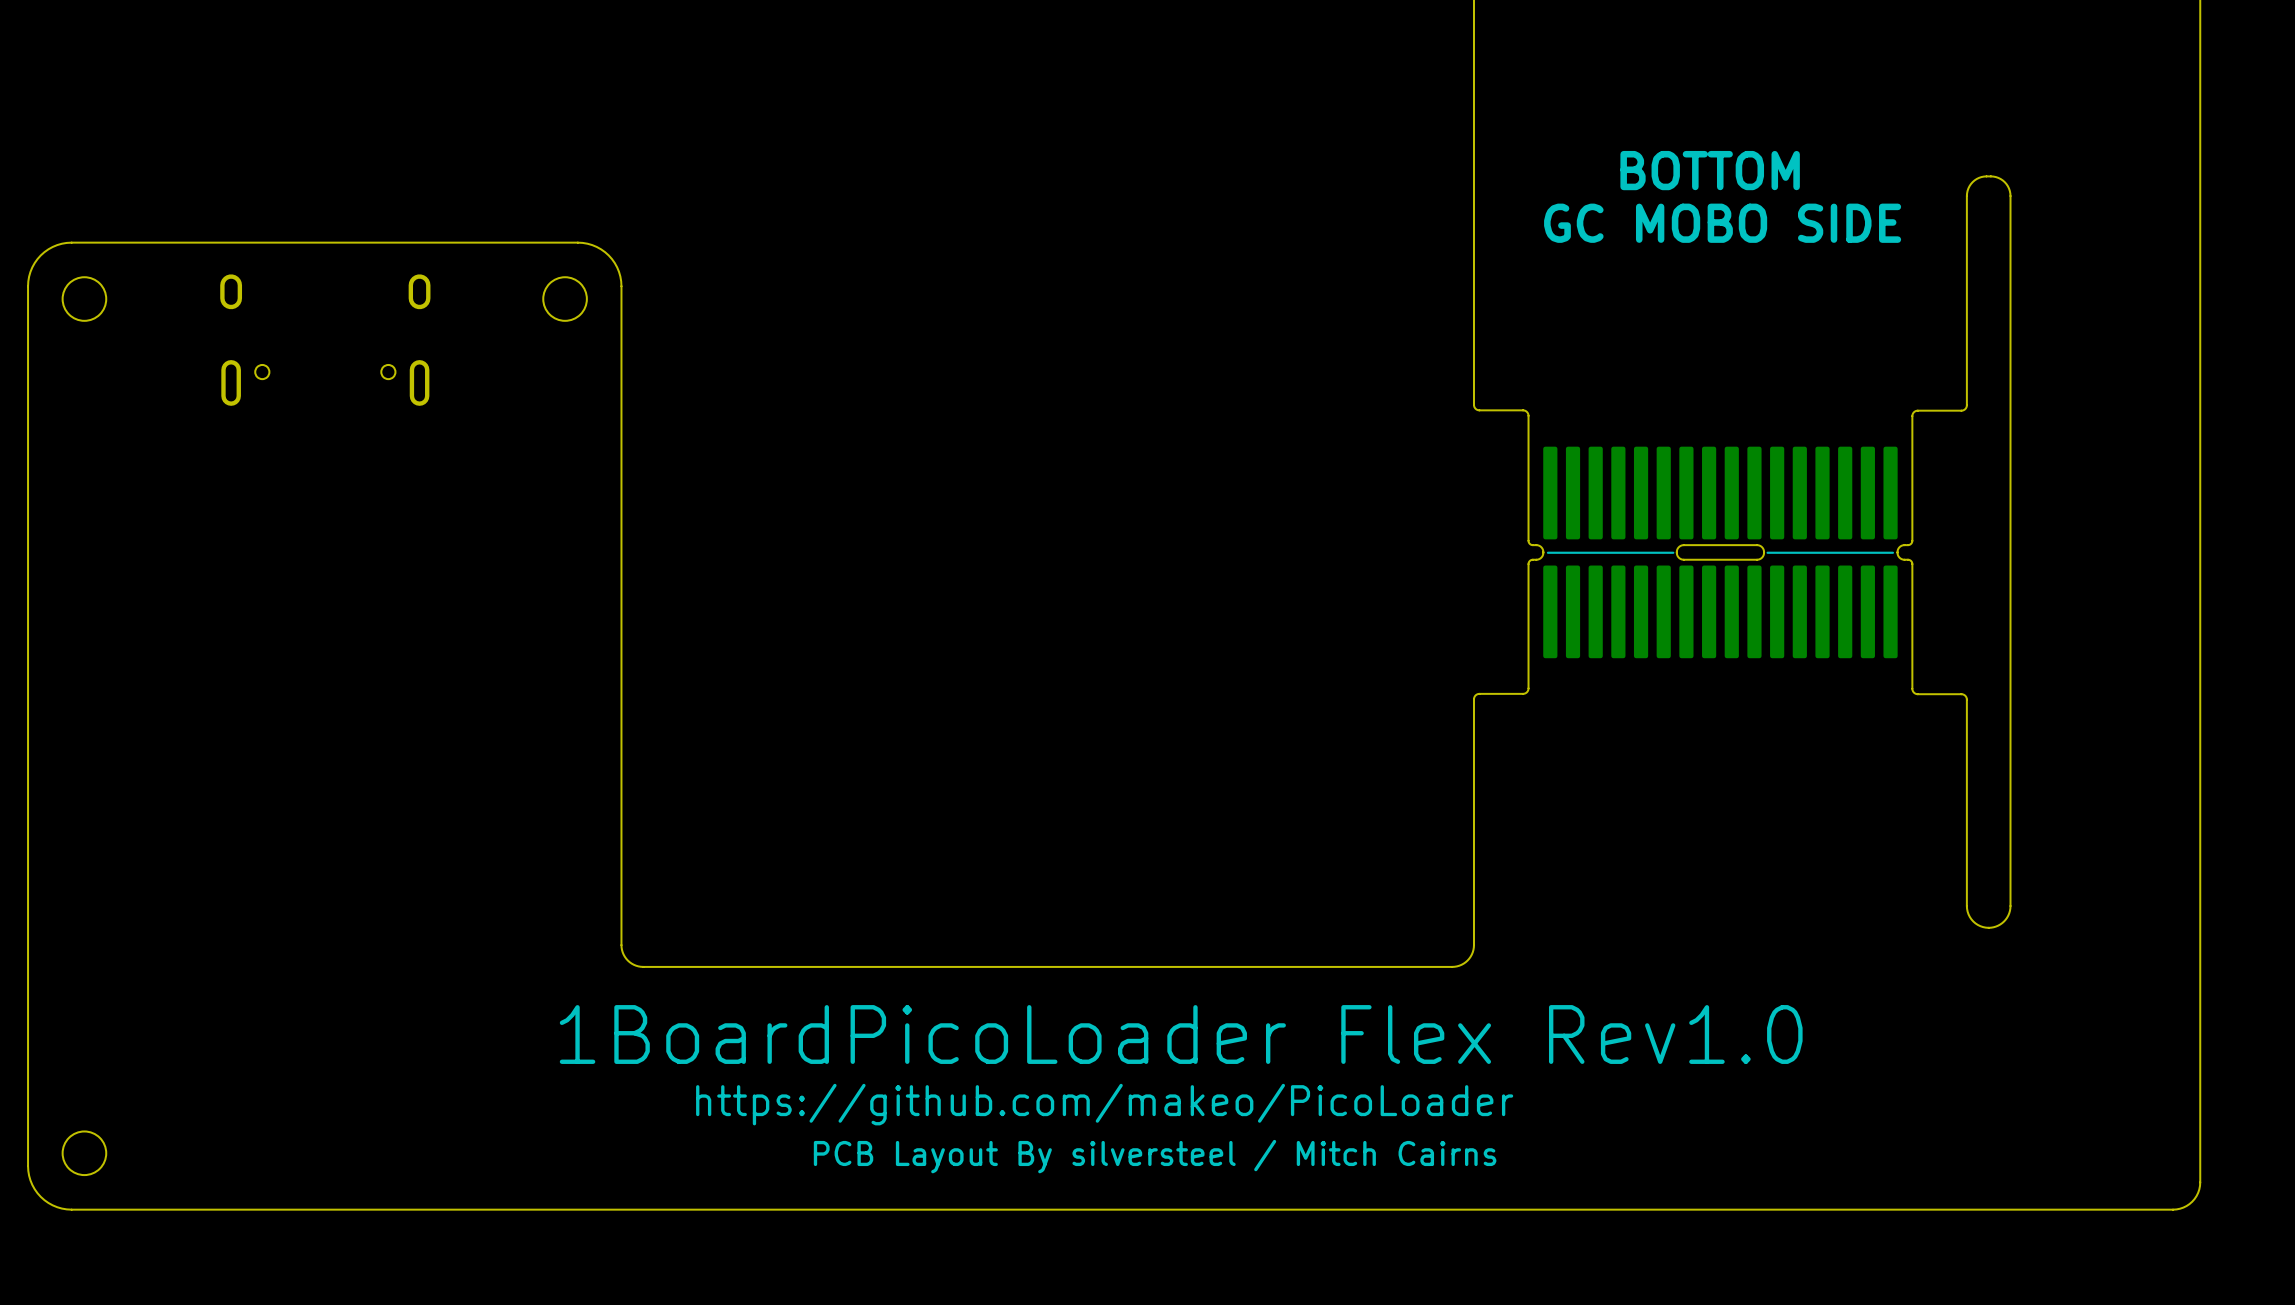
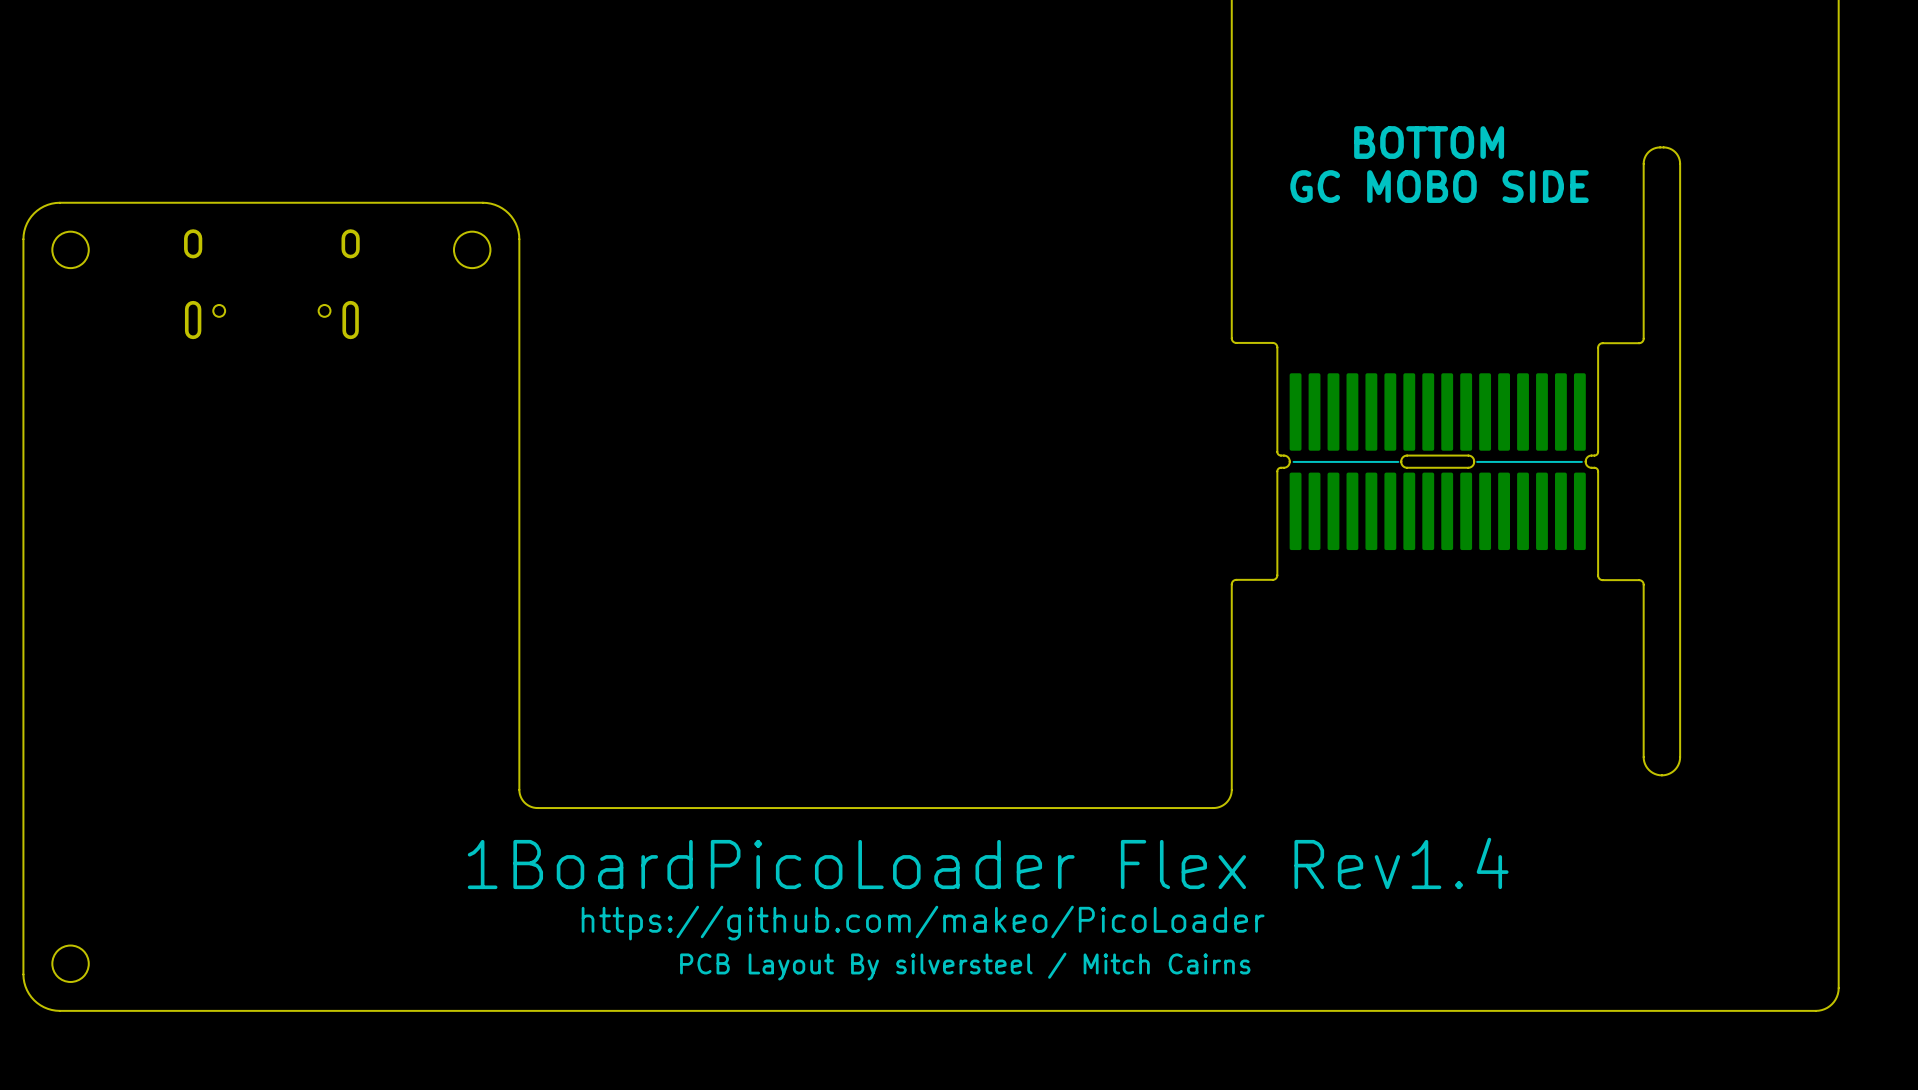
text: 1BoardPicoLoader Flex Rev1.0 (1181, 1034) -> 1BoardPicoLoader Flex Rev1.4 (988, 863)

